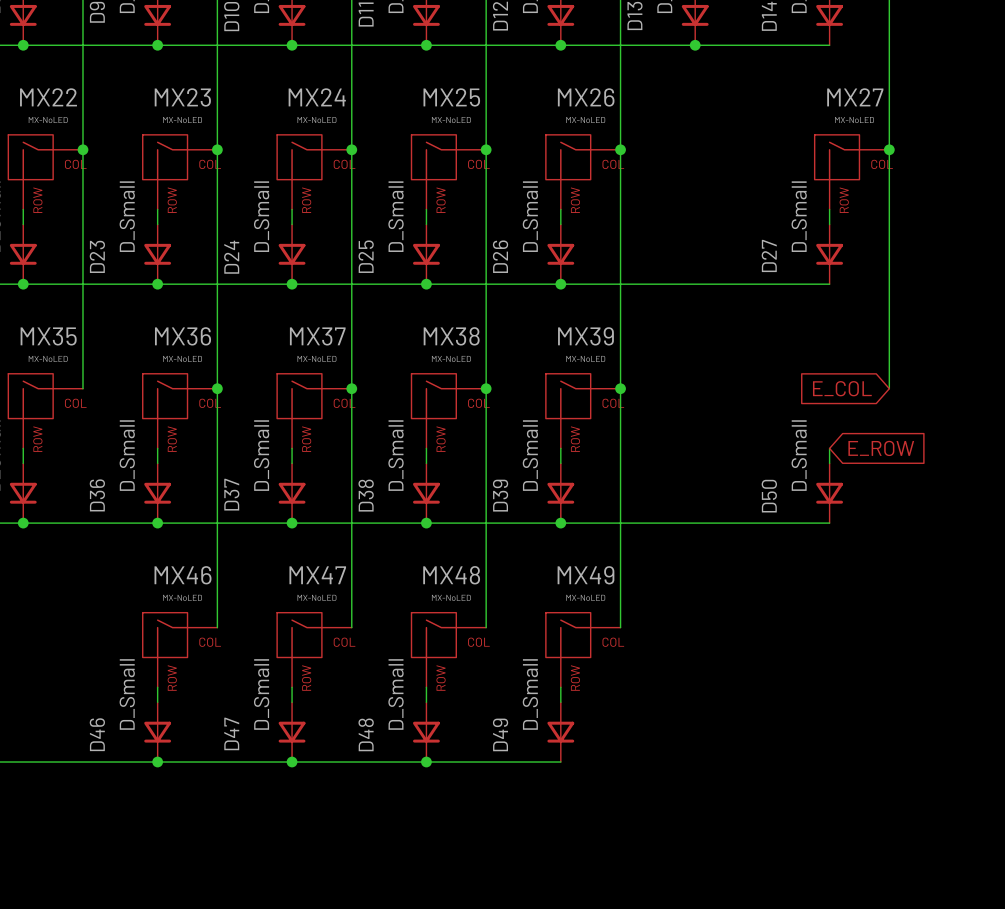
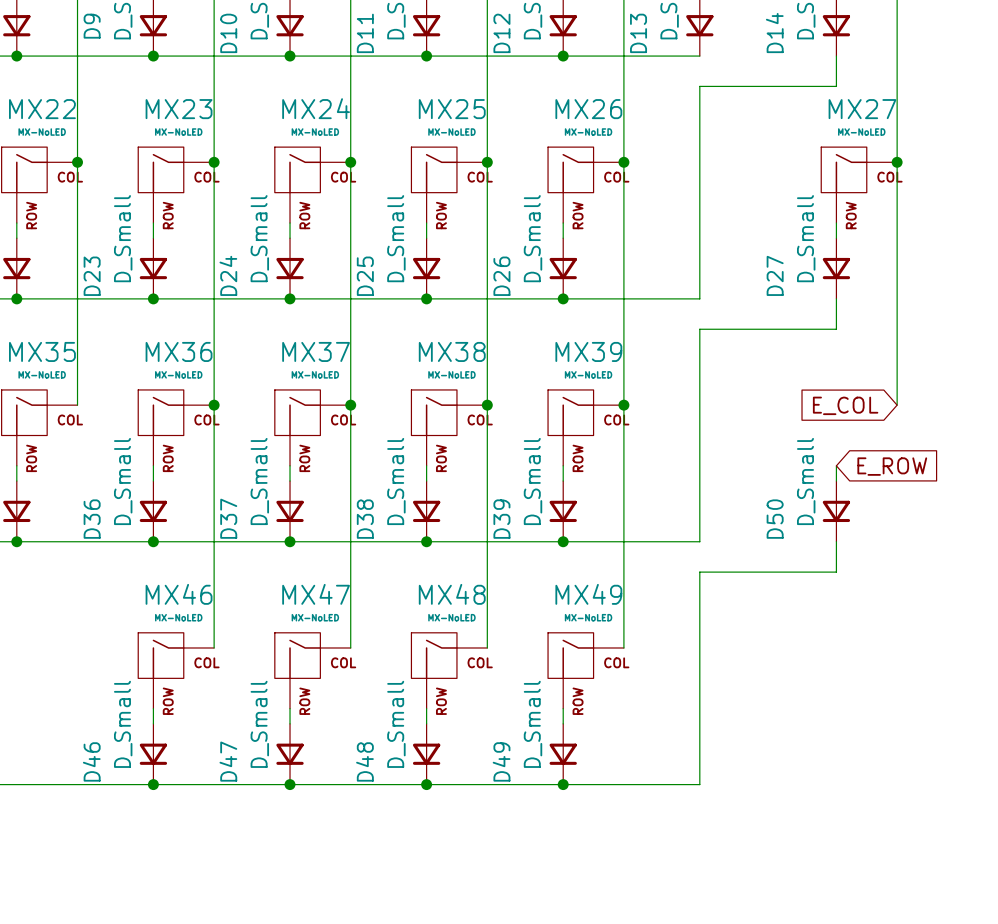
wire: (695, 45) (829, 45) -> (699, 298) (699, 86) (836, 86) (836, 56)
junction: (695, 45) -> none
wire: (695, 284) (829, 284) -> (699, 541) (699, 329) (836, 329) (836, 298)
wire: (695, 523) (829, 523) -> (563, 784) (699, 784) (699, 572) (836, 572) (836, 541)
junction: none -> (563, 784)

